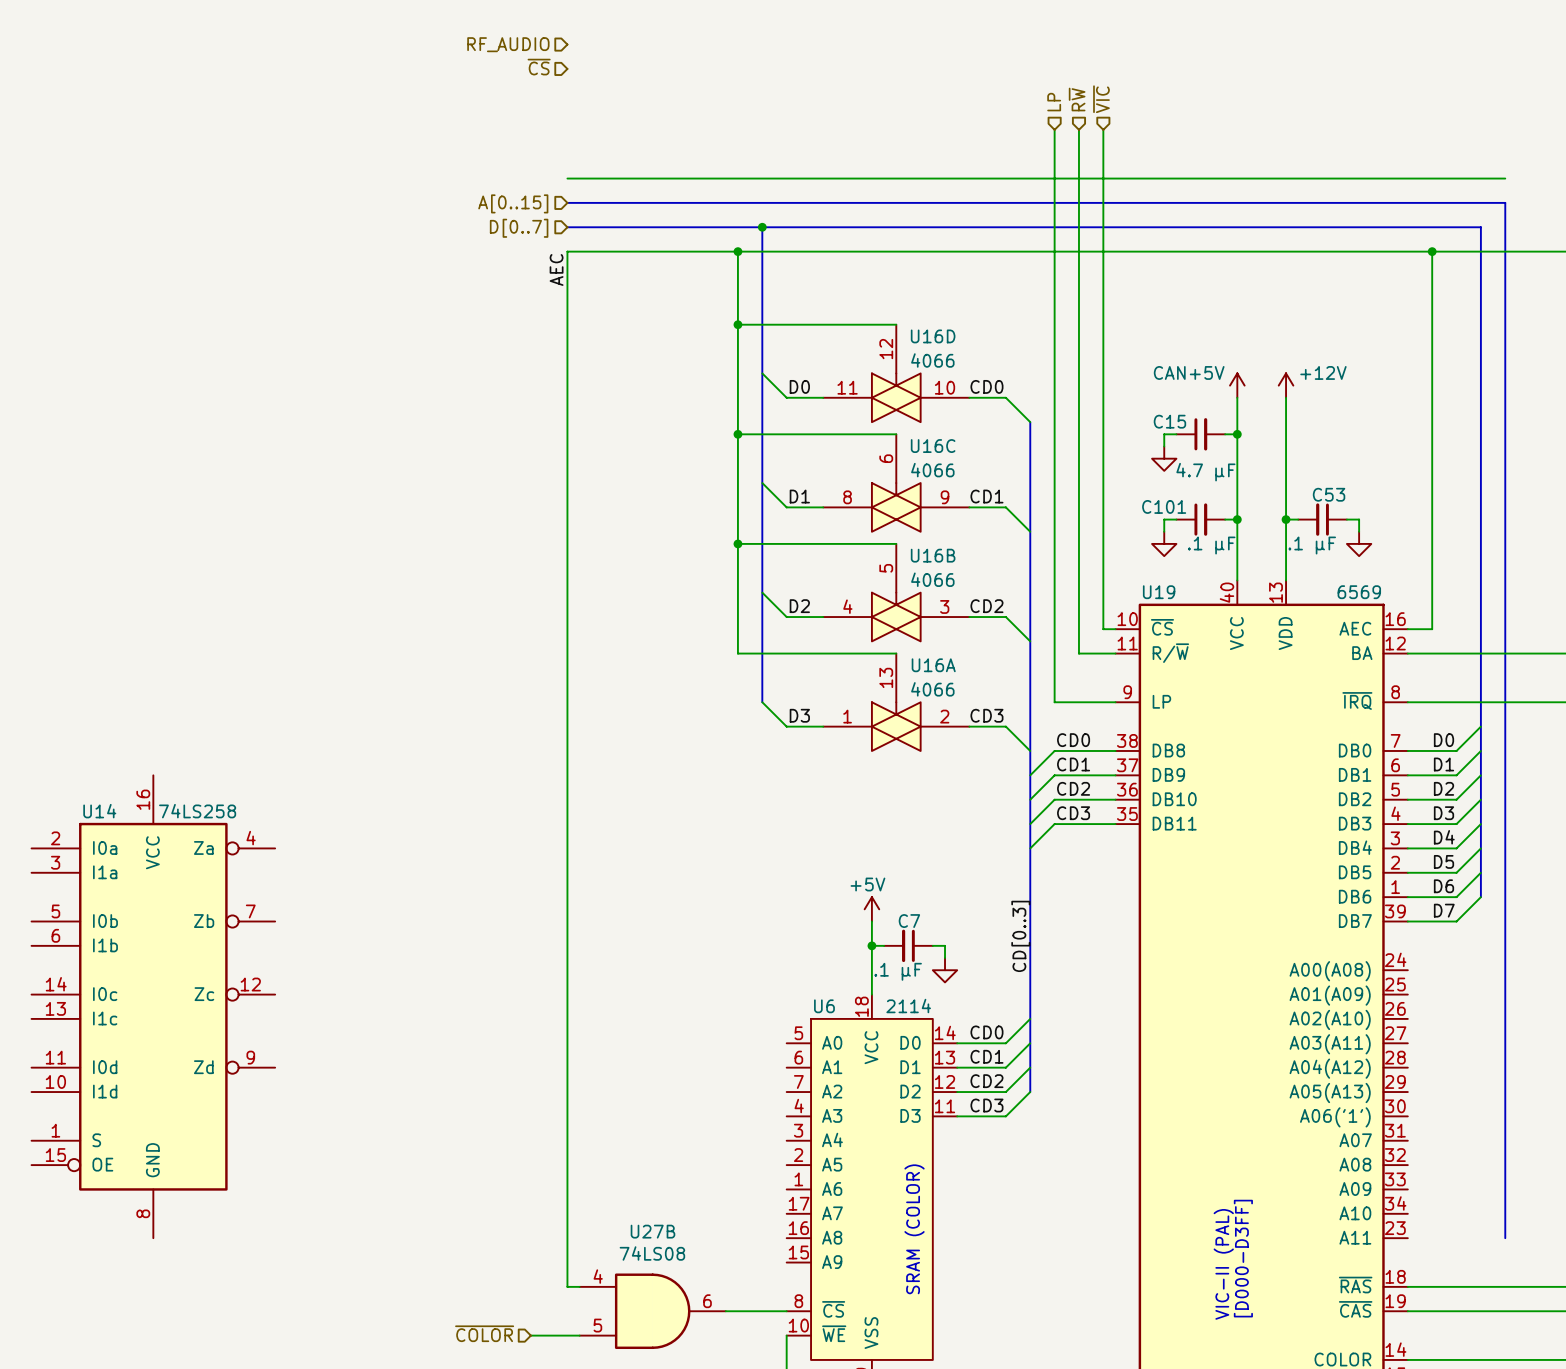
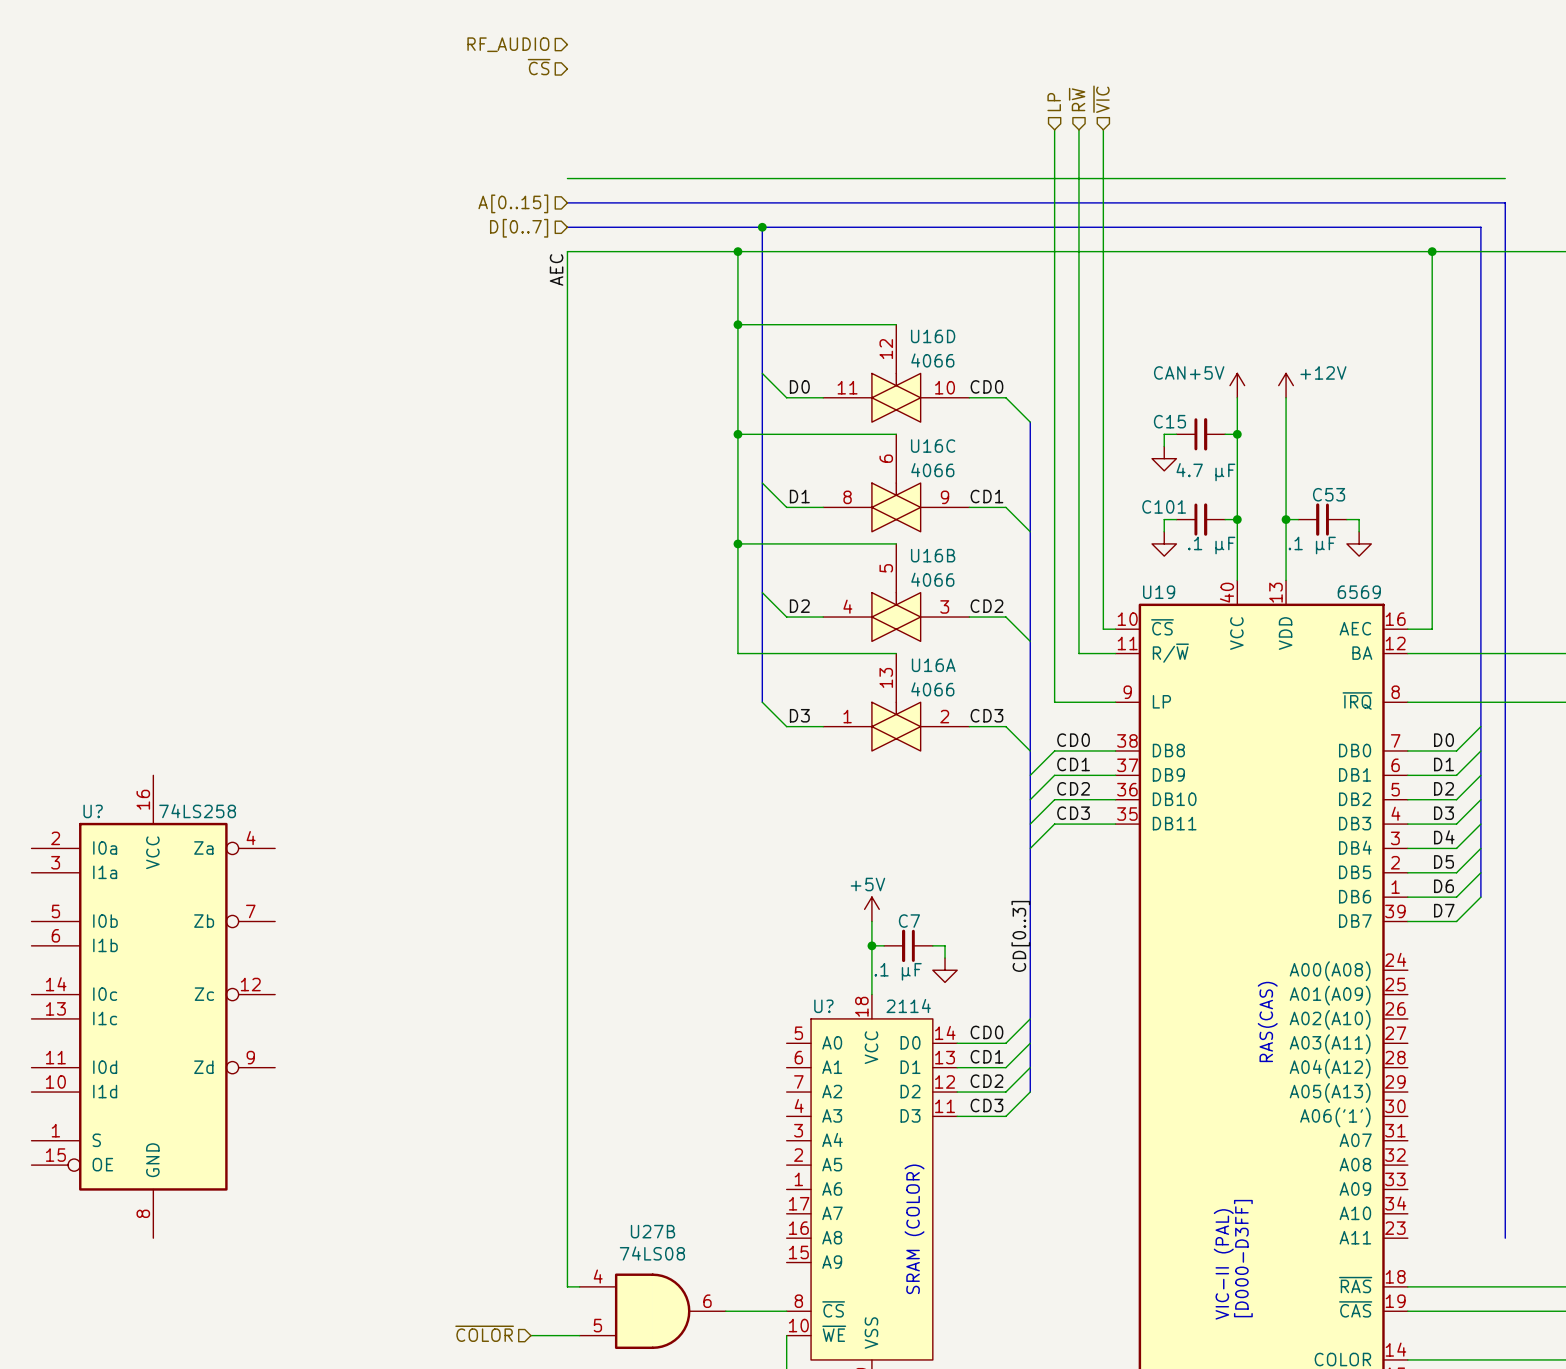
U14 name: U14 (99, 811) -> U? (93, 811)
U6 name: U6 (824, 1006) -> U? (823, 1006)
text: none -> RAS(CAS) (1267, 1021)

